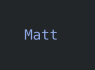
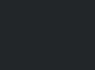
text: Matt (40, 34) -> none

